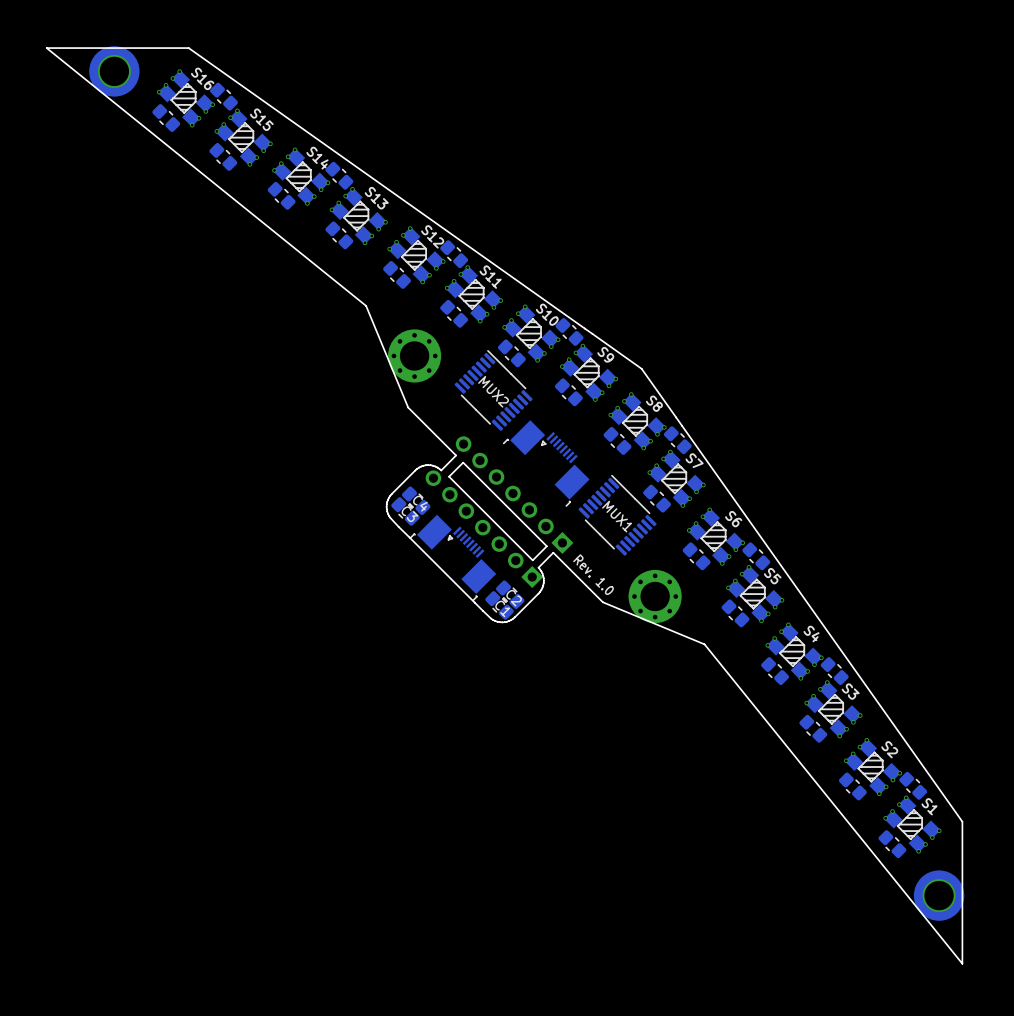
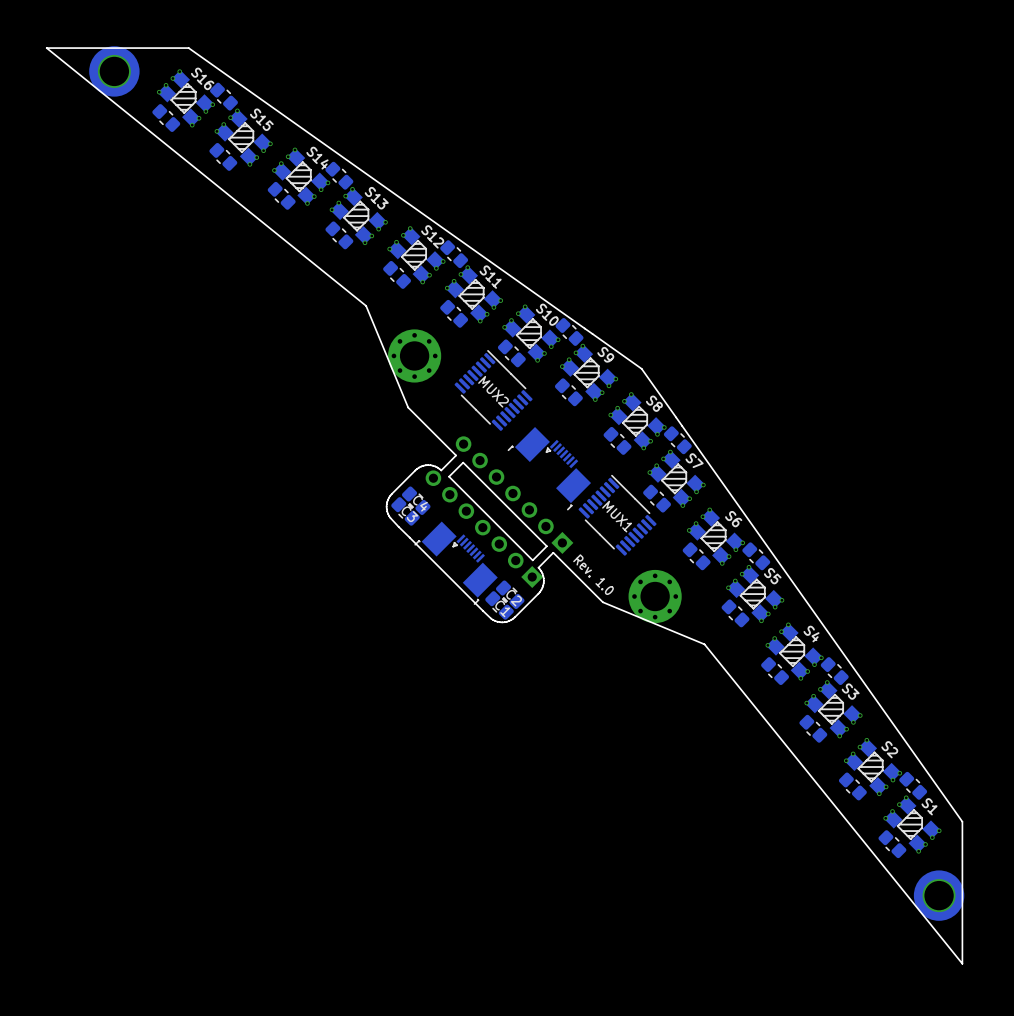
part footprint: [503, 420, 590, 507] -> [507, 427, 592, 511]
part footprint: [409, 514, 497, 602] -> [414, 521, 498, 605]

